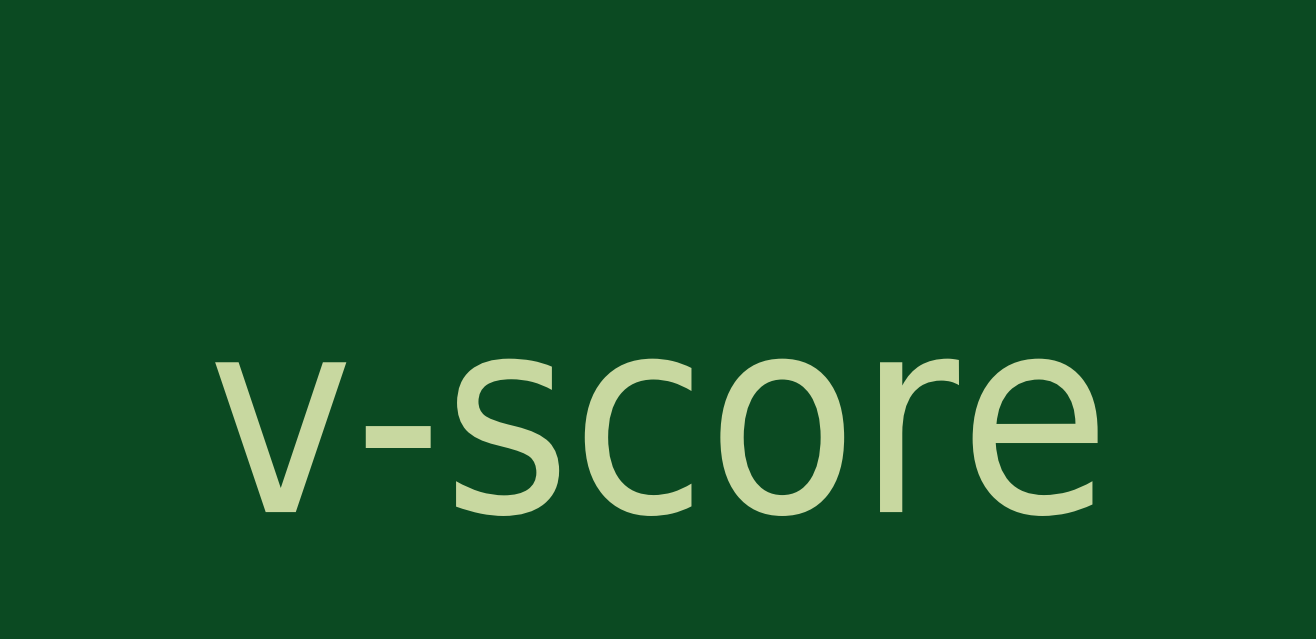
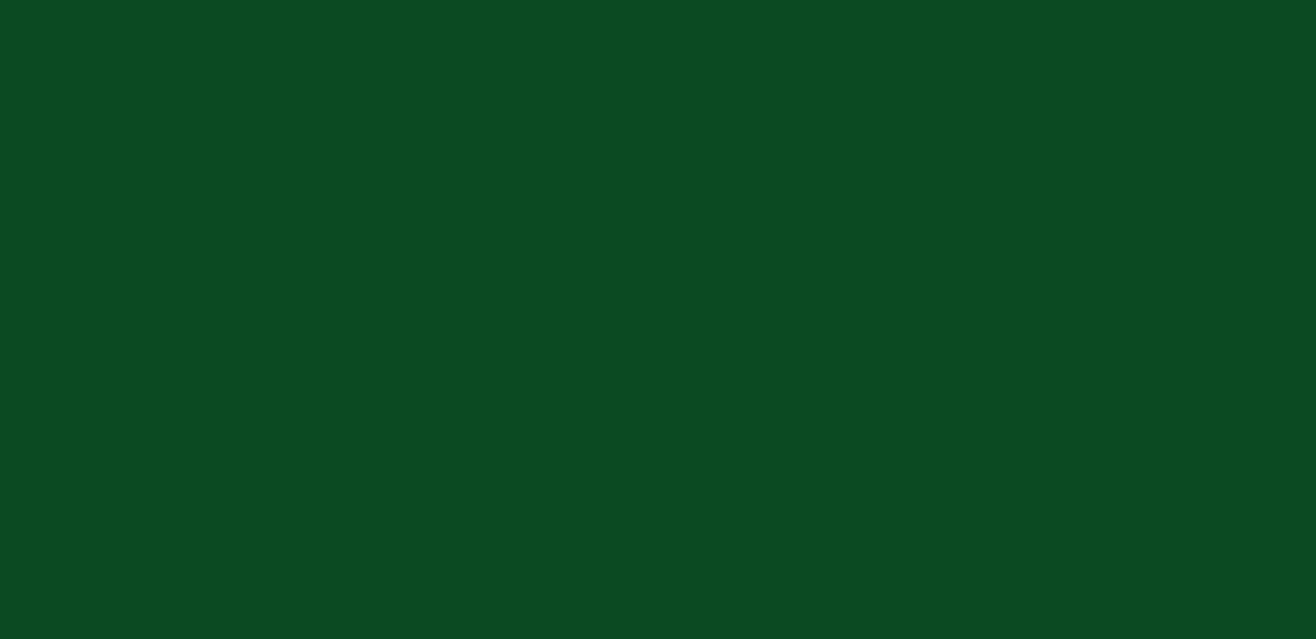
text: v-score (656, 437) -> none

